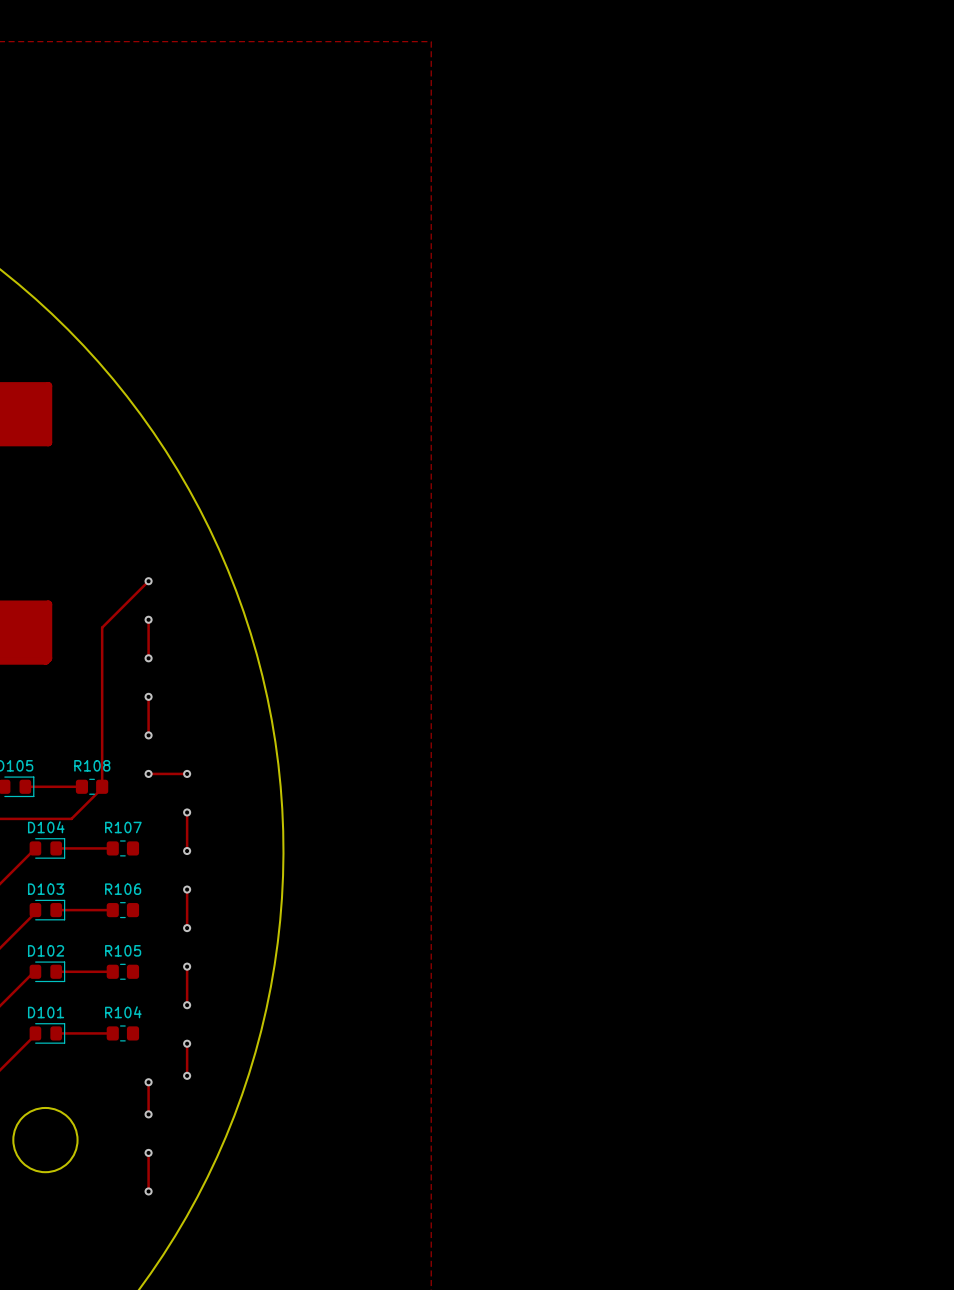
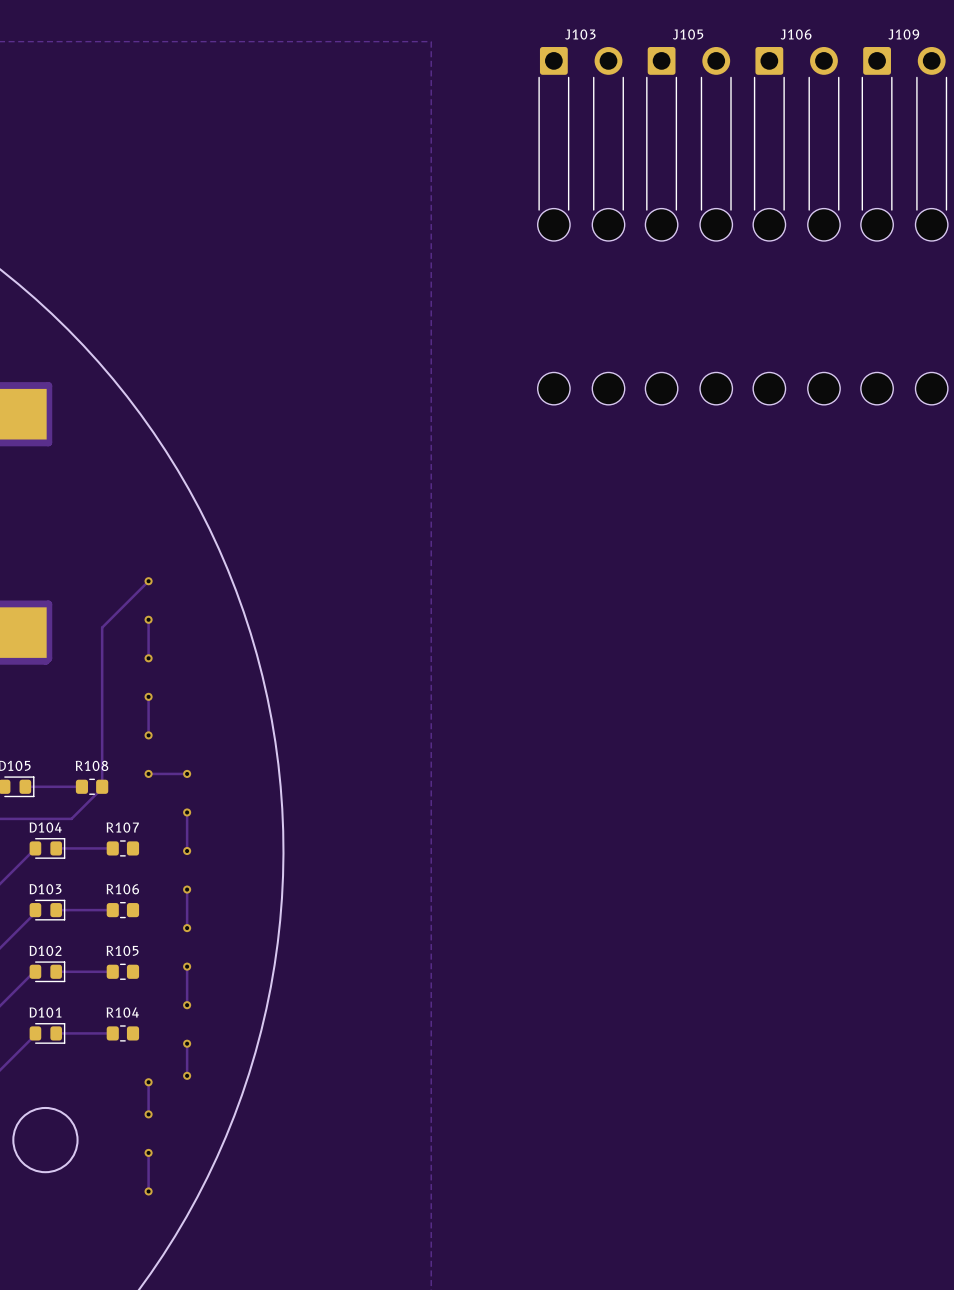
J103: none -> (581, 225)
J105: none -> (688, 225)
J106: none -> (796, 225)
J109: none -> (904, 225)

